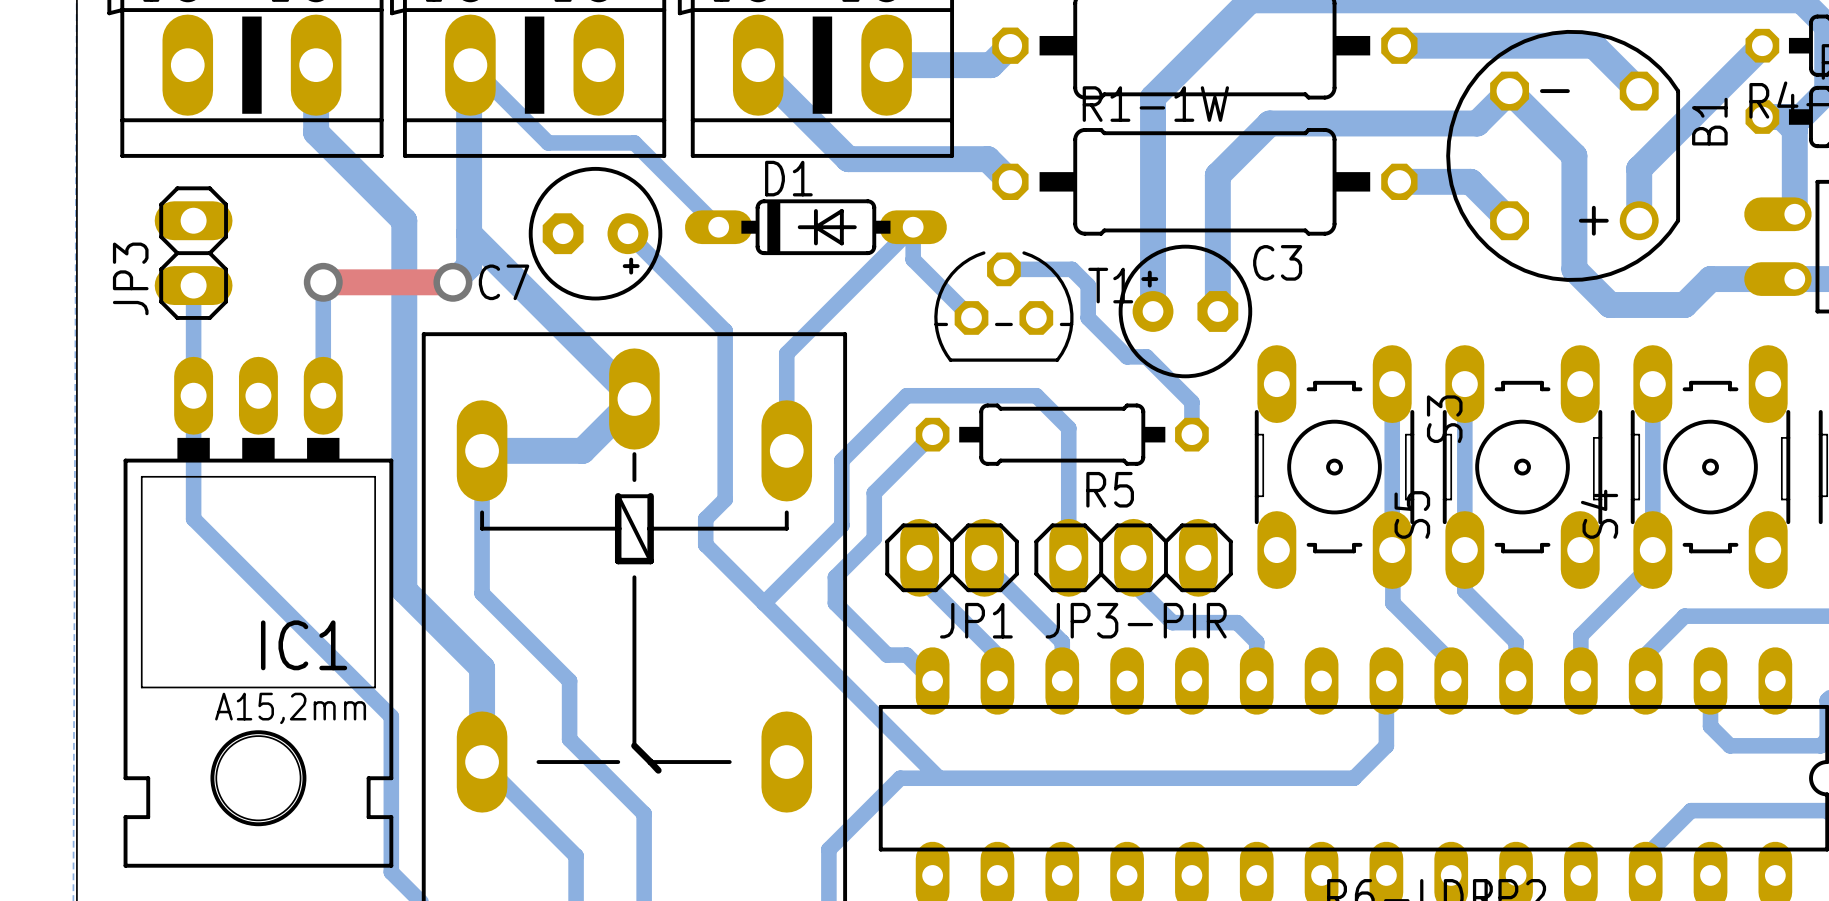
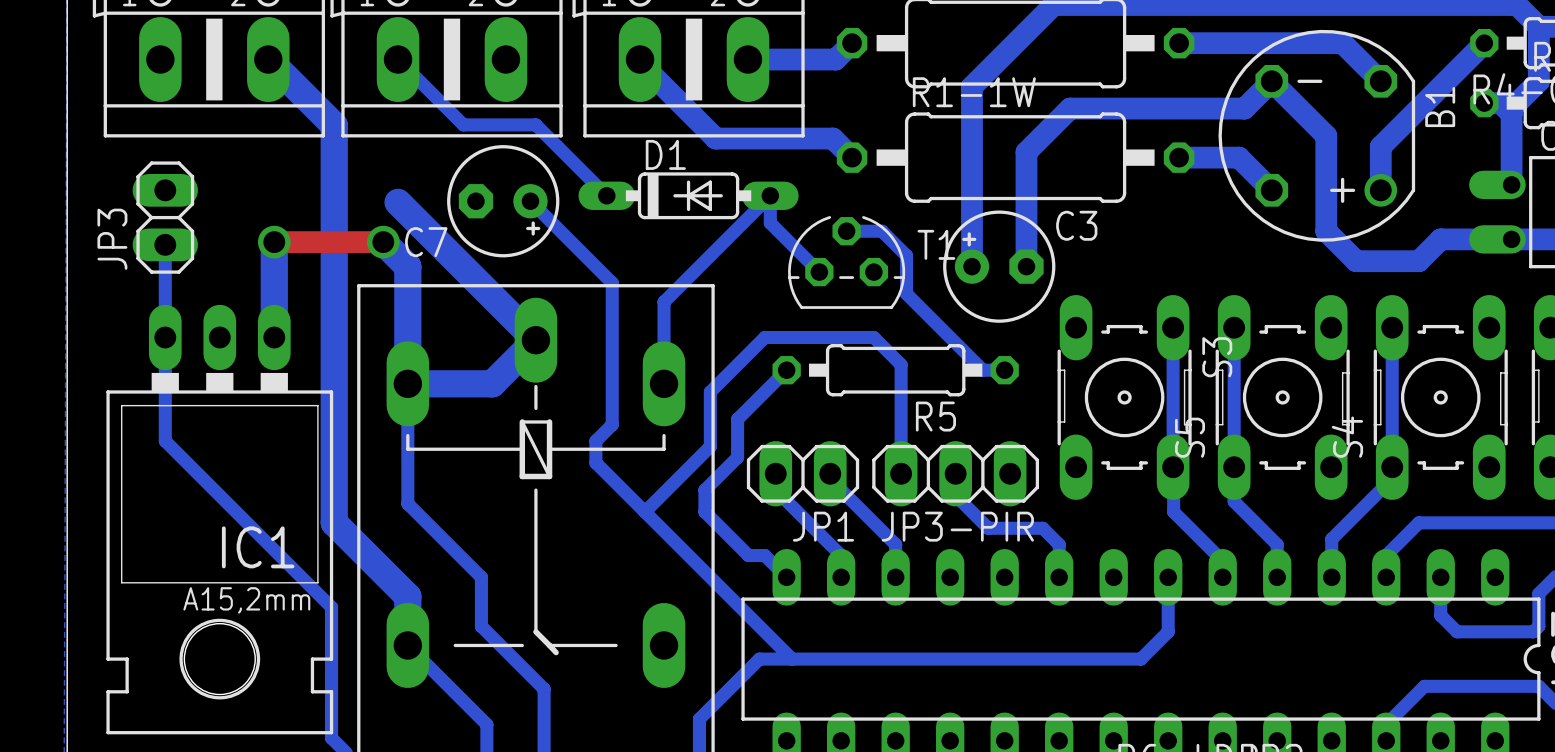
bottom track: (316, 65) (316, 132) (404, 220) (404, 590) (482, 668) (482, 703) -> (268, 59) (334, 125) (334, 522) (407, 596)
bottom track: (469, 66) (469, 266) (452, 282) -> (407, 383) (407, 266) (383, 242)
bottom track width: thin (470, 234) (634, 399) (582, 450) (482, 450) -> thick (398, 202) (535, 340) (492, 383) (407, 383)
bottom track: (1046, 269) (1071, 269) (1088, 285) (1088, 317) (1127, 356) (1146, 356) (1191, 402) (1191, 434) -> (882, 231) (906, 255) (906, 293) (982, 370) (1004, 370)
bottom track width: thin (323, 282) (323, 395) -> thick (274, 242) (274, 337)

